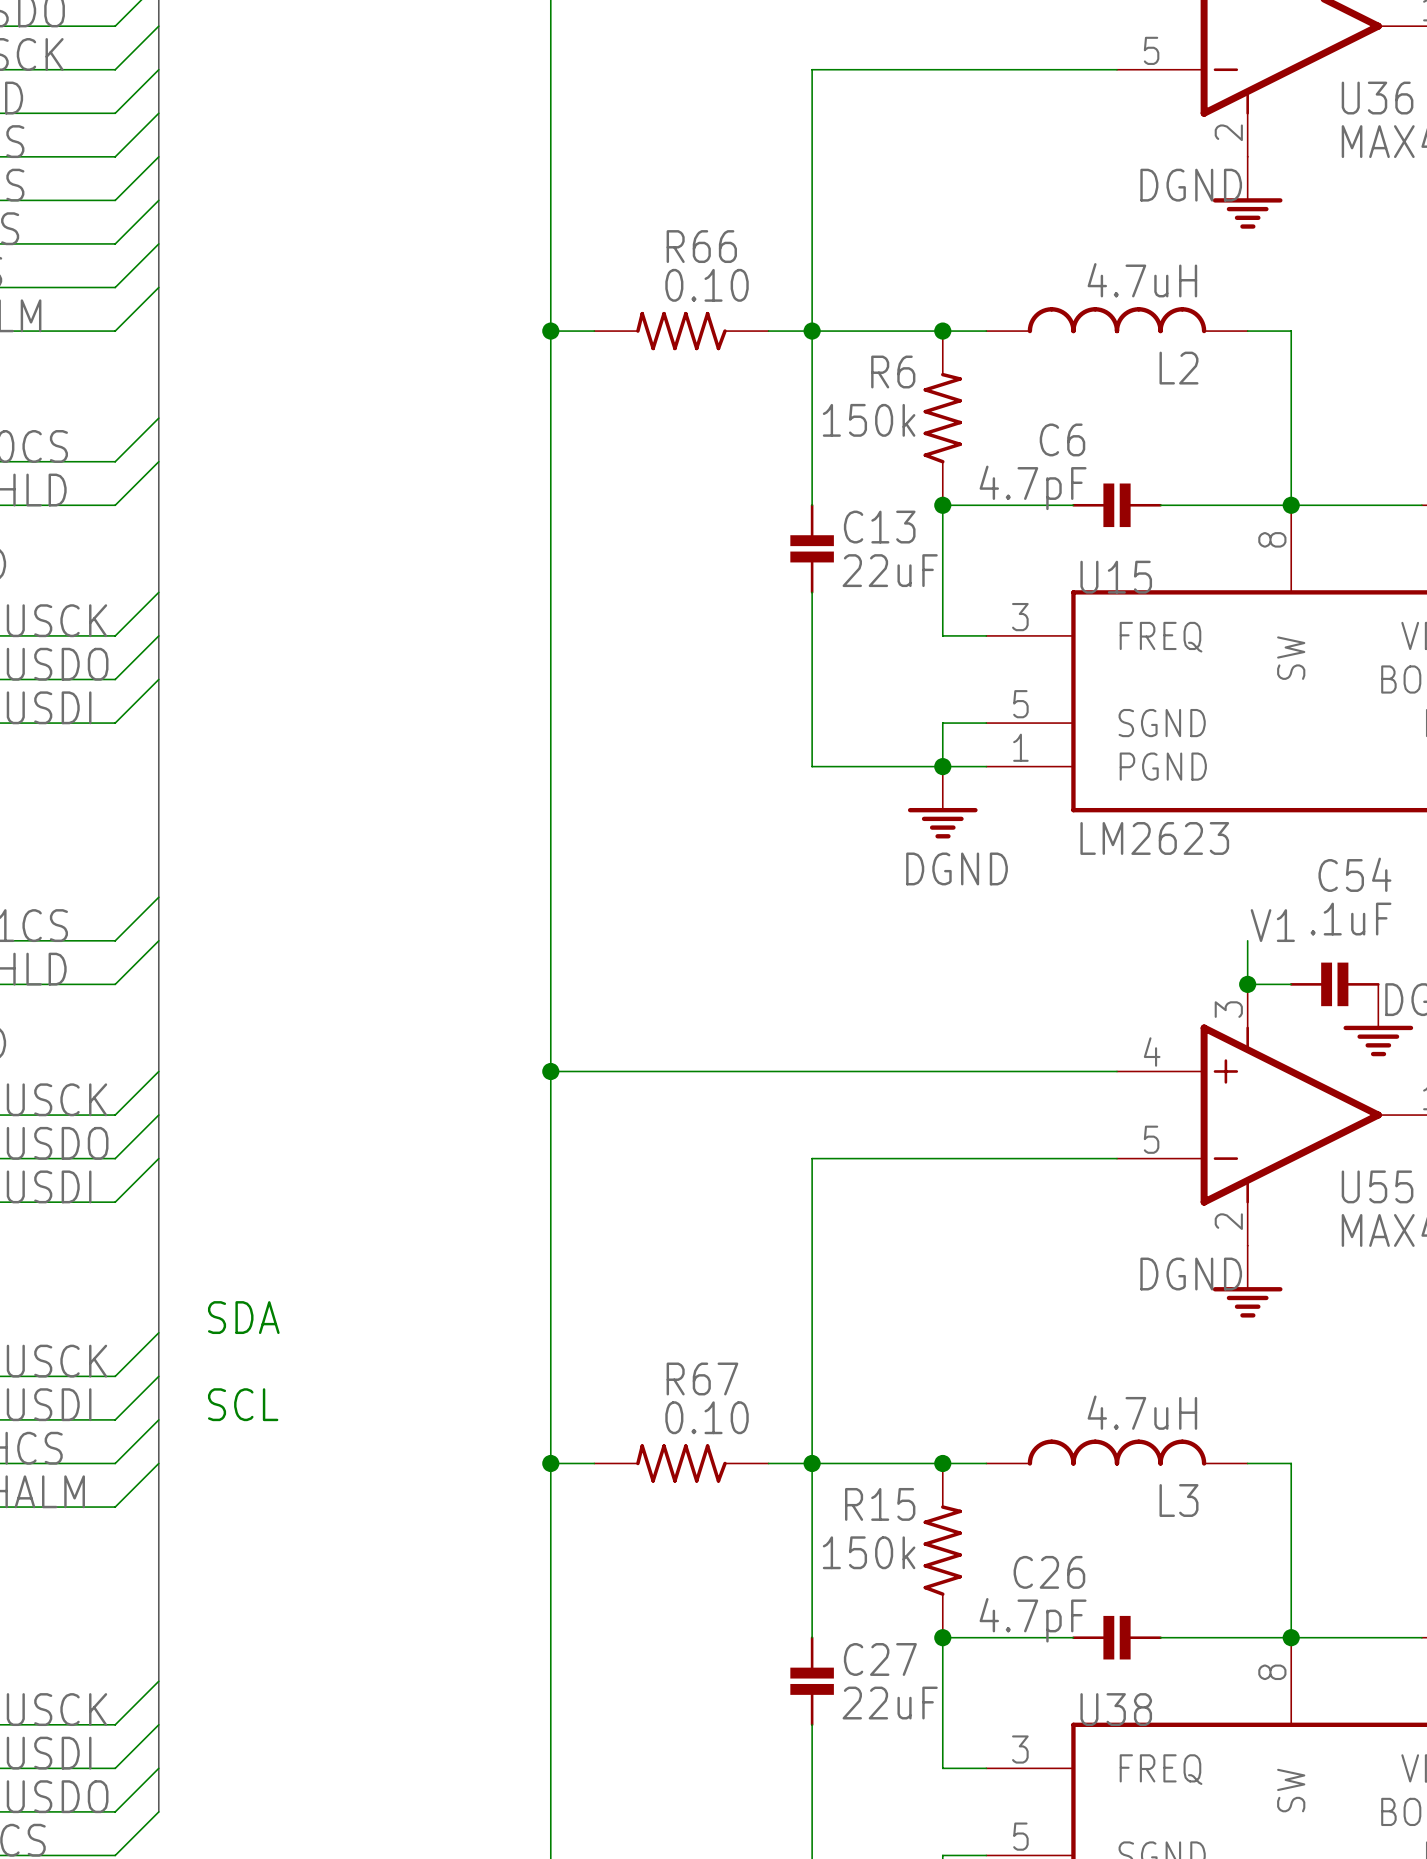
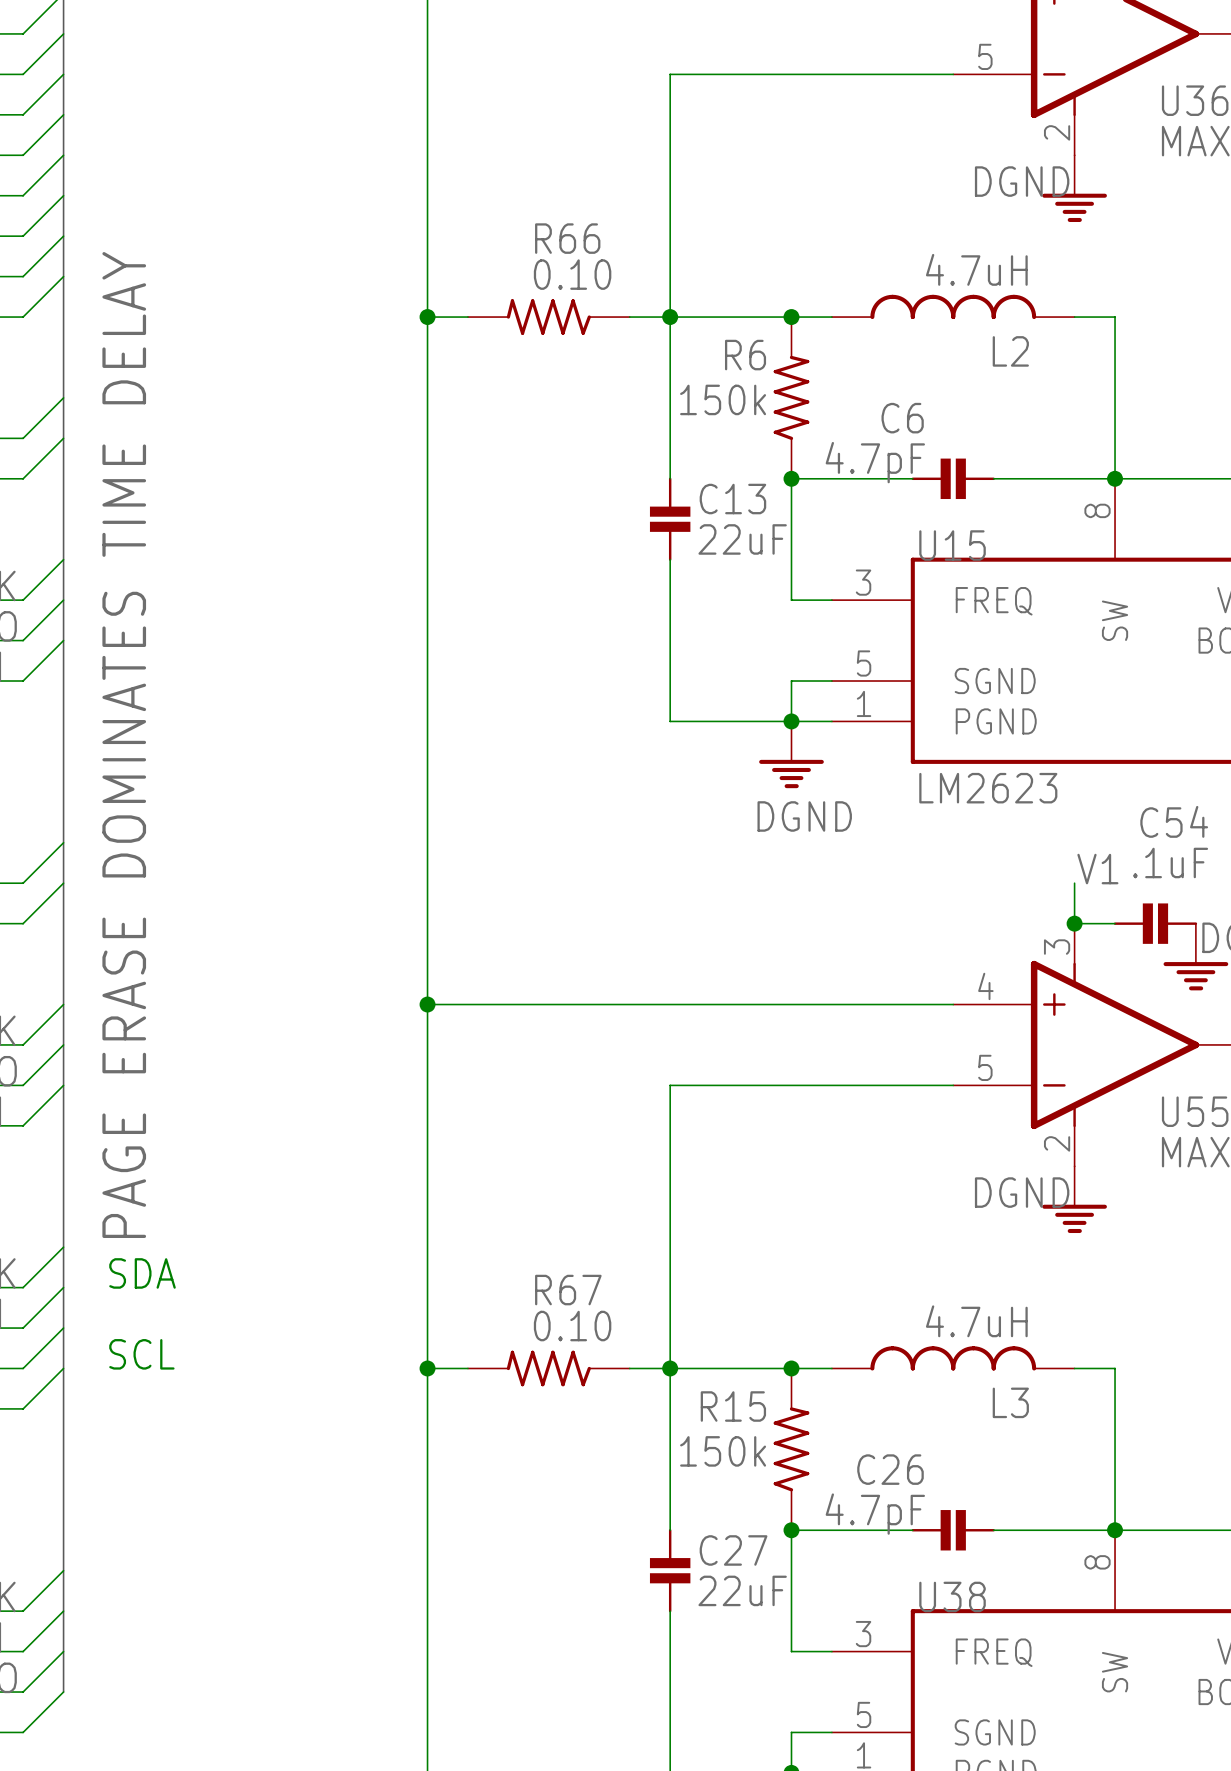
text: none -> PAGE ERASE DOMINATES TIME DELAY (124, 745)
text position: SDA (243, 1317) -> SDA (142, 1273)
text position: SCL (243, 1404) -> SCL (141, 1354)

